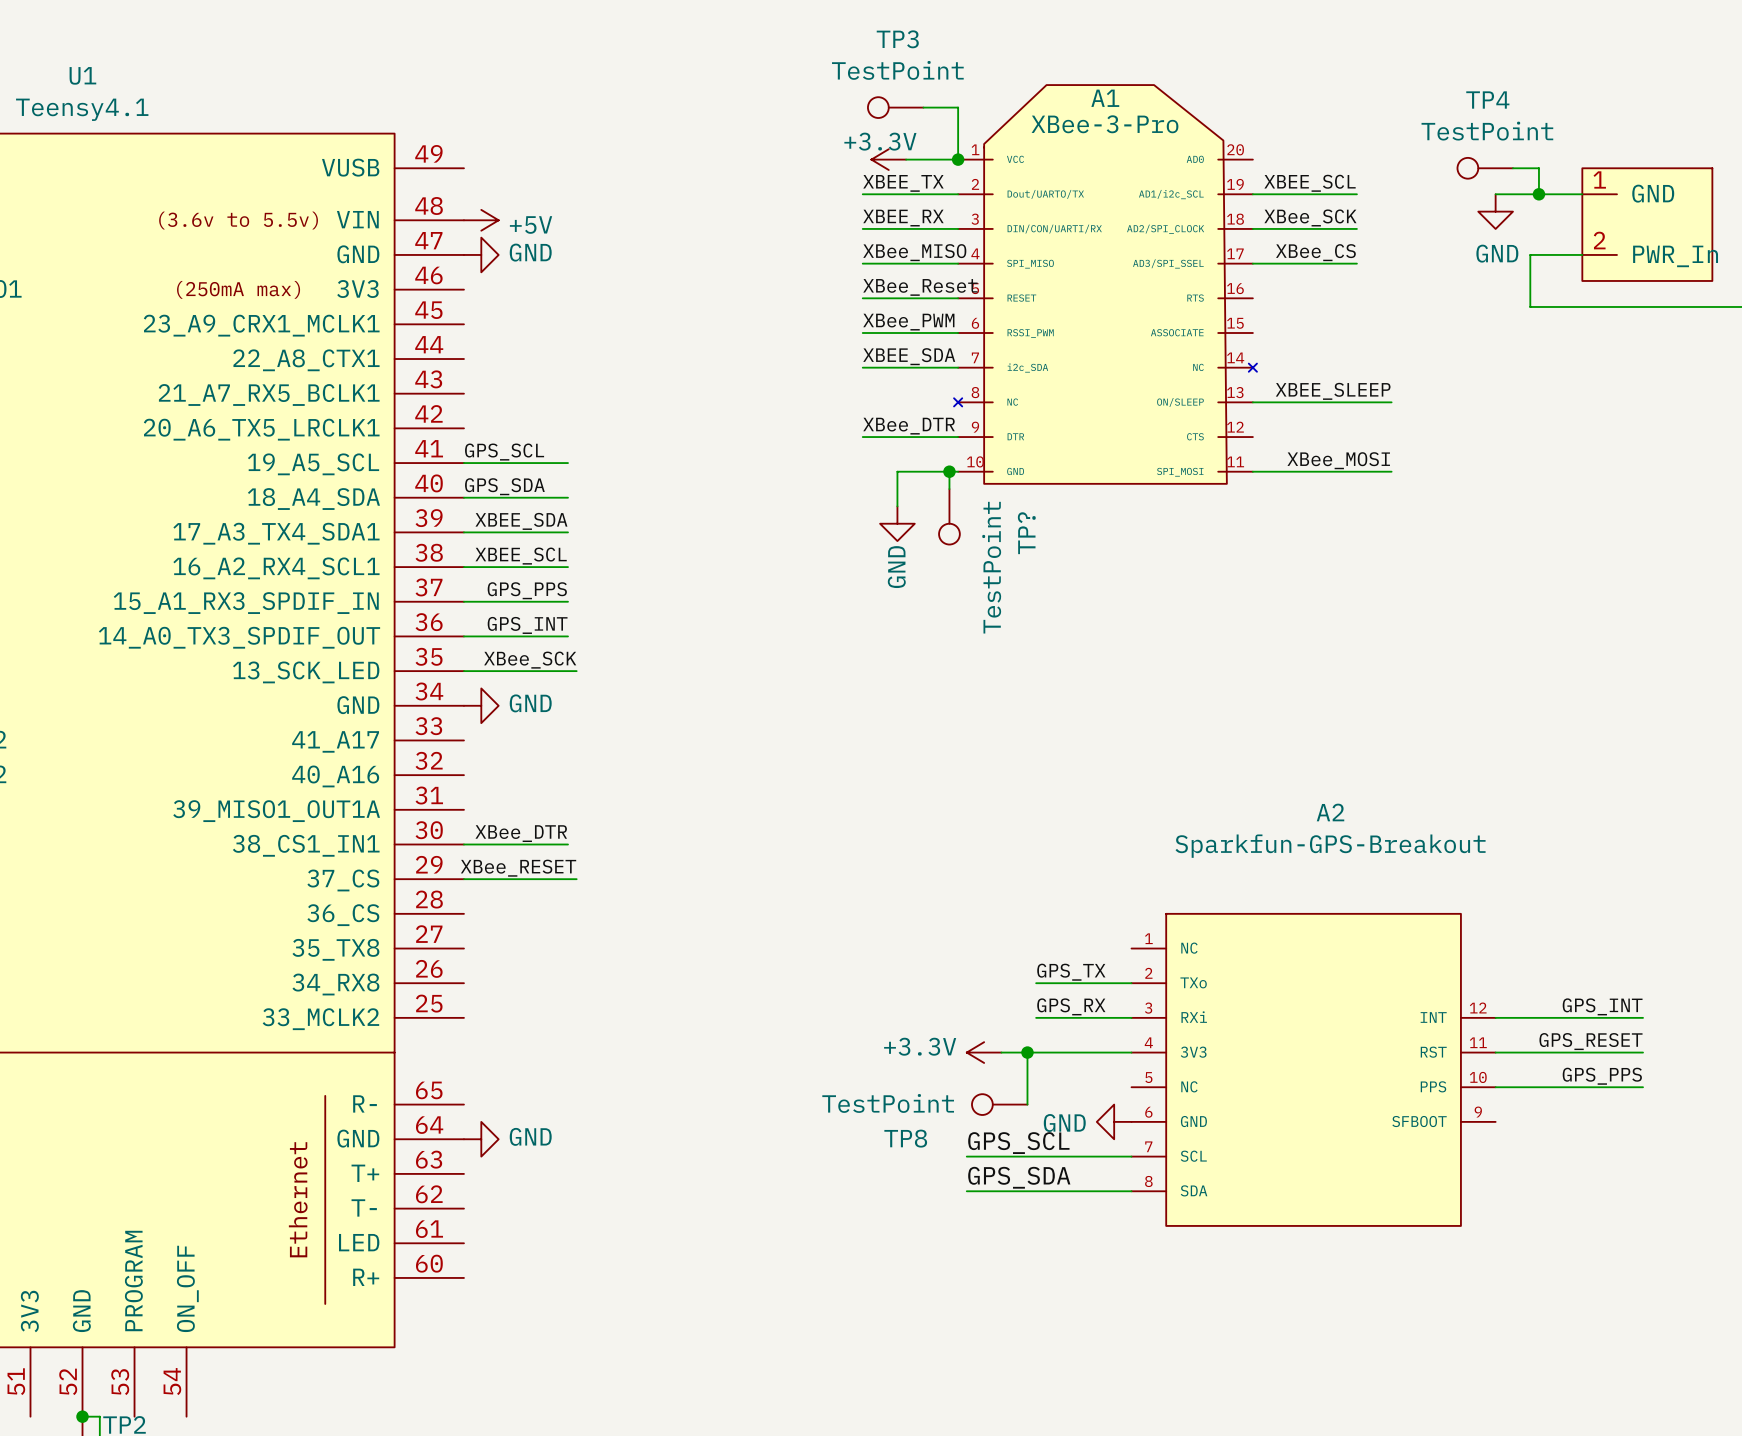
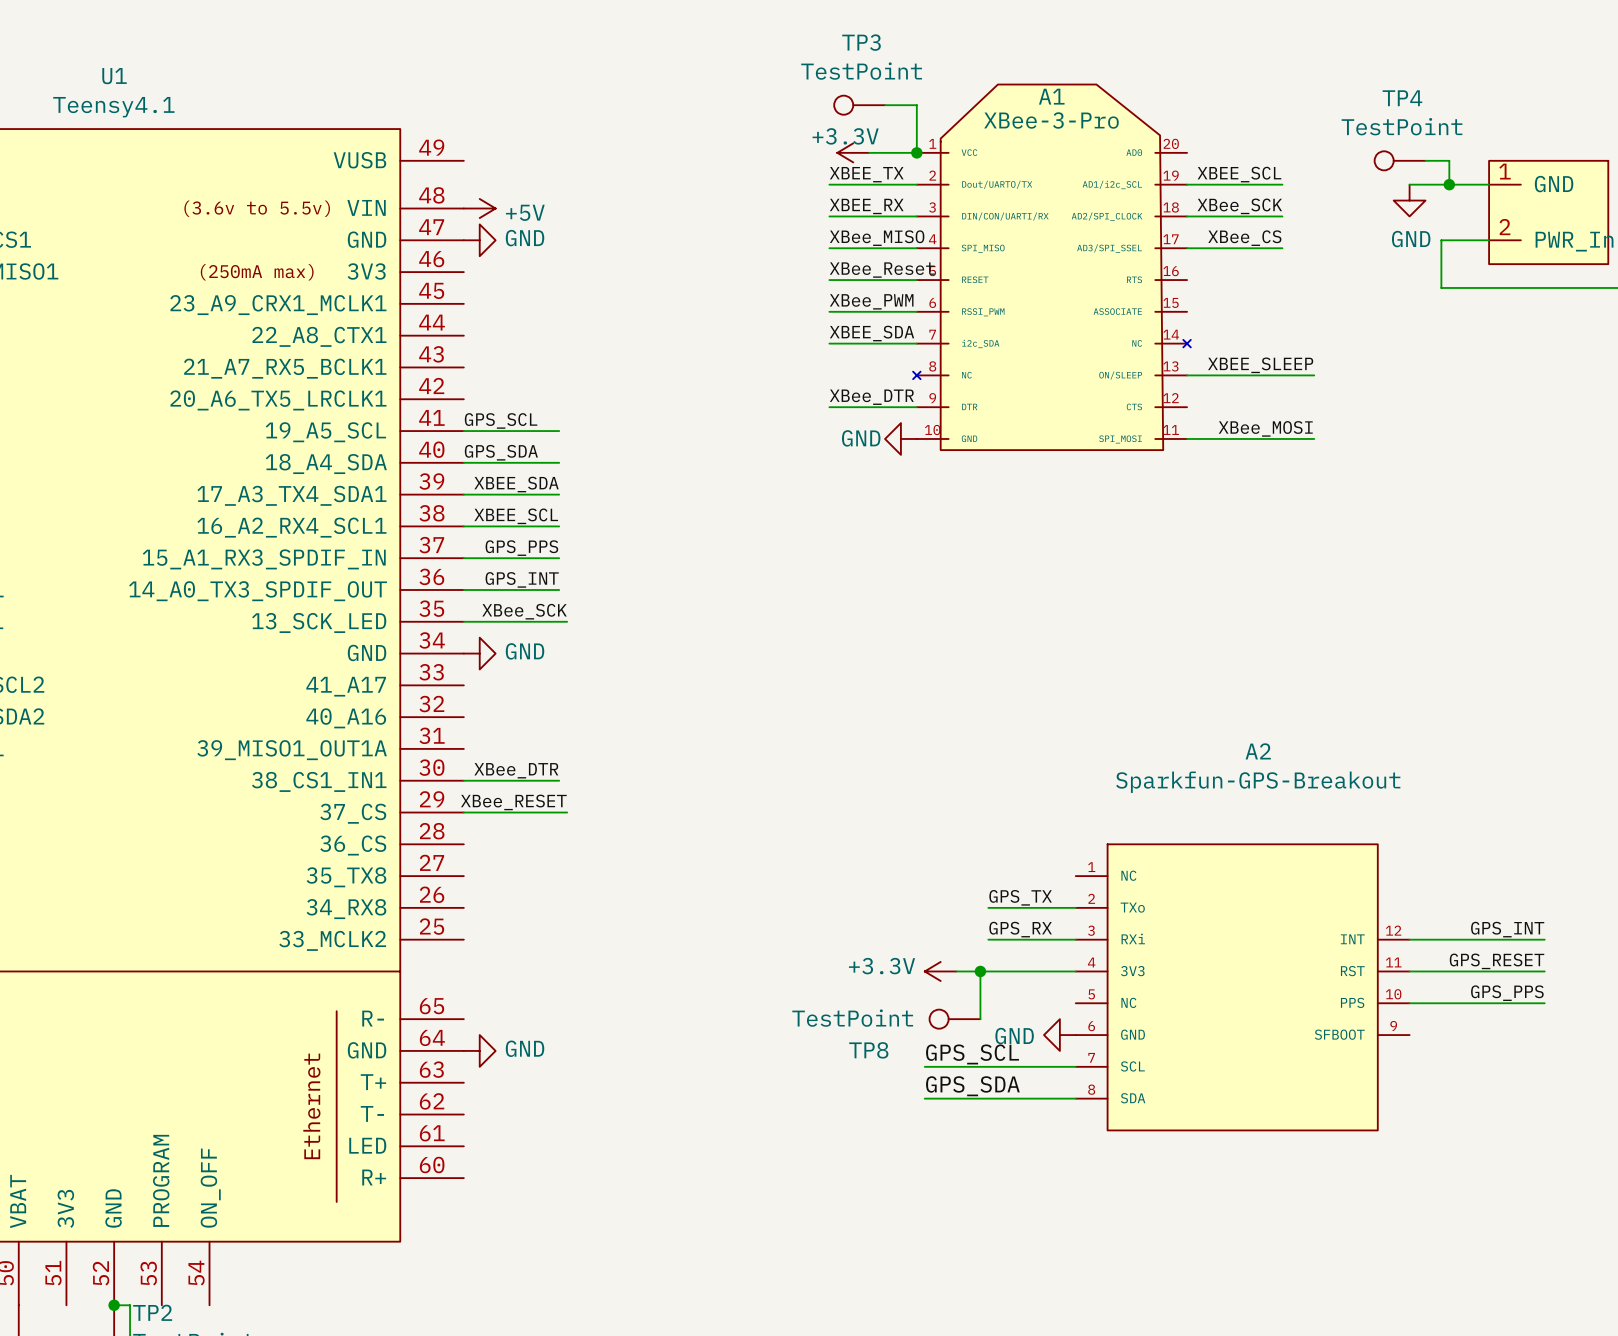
wire: (949, 471) (949, 489) -> none
junction: (949, 471) -> none
wire: (958, 471) (897, 471) (897, 506) -> none
TP?: TestPoint (949, 516) -> none
power symbol rotation: 0° (897, 523) -> 90° clockwise (900, 438)
power symbol position: GND (897, 523) -> GND (900, 438)

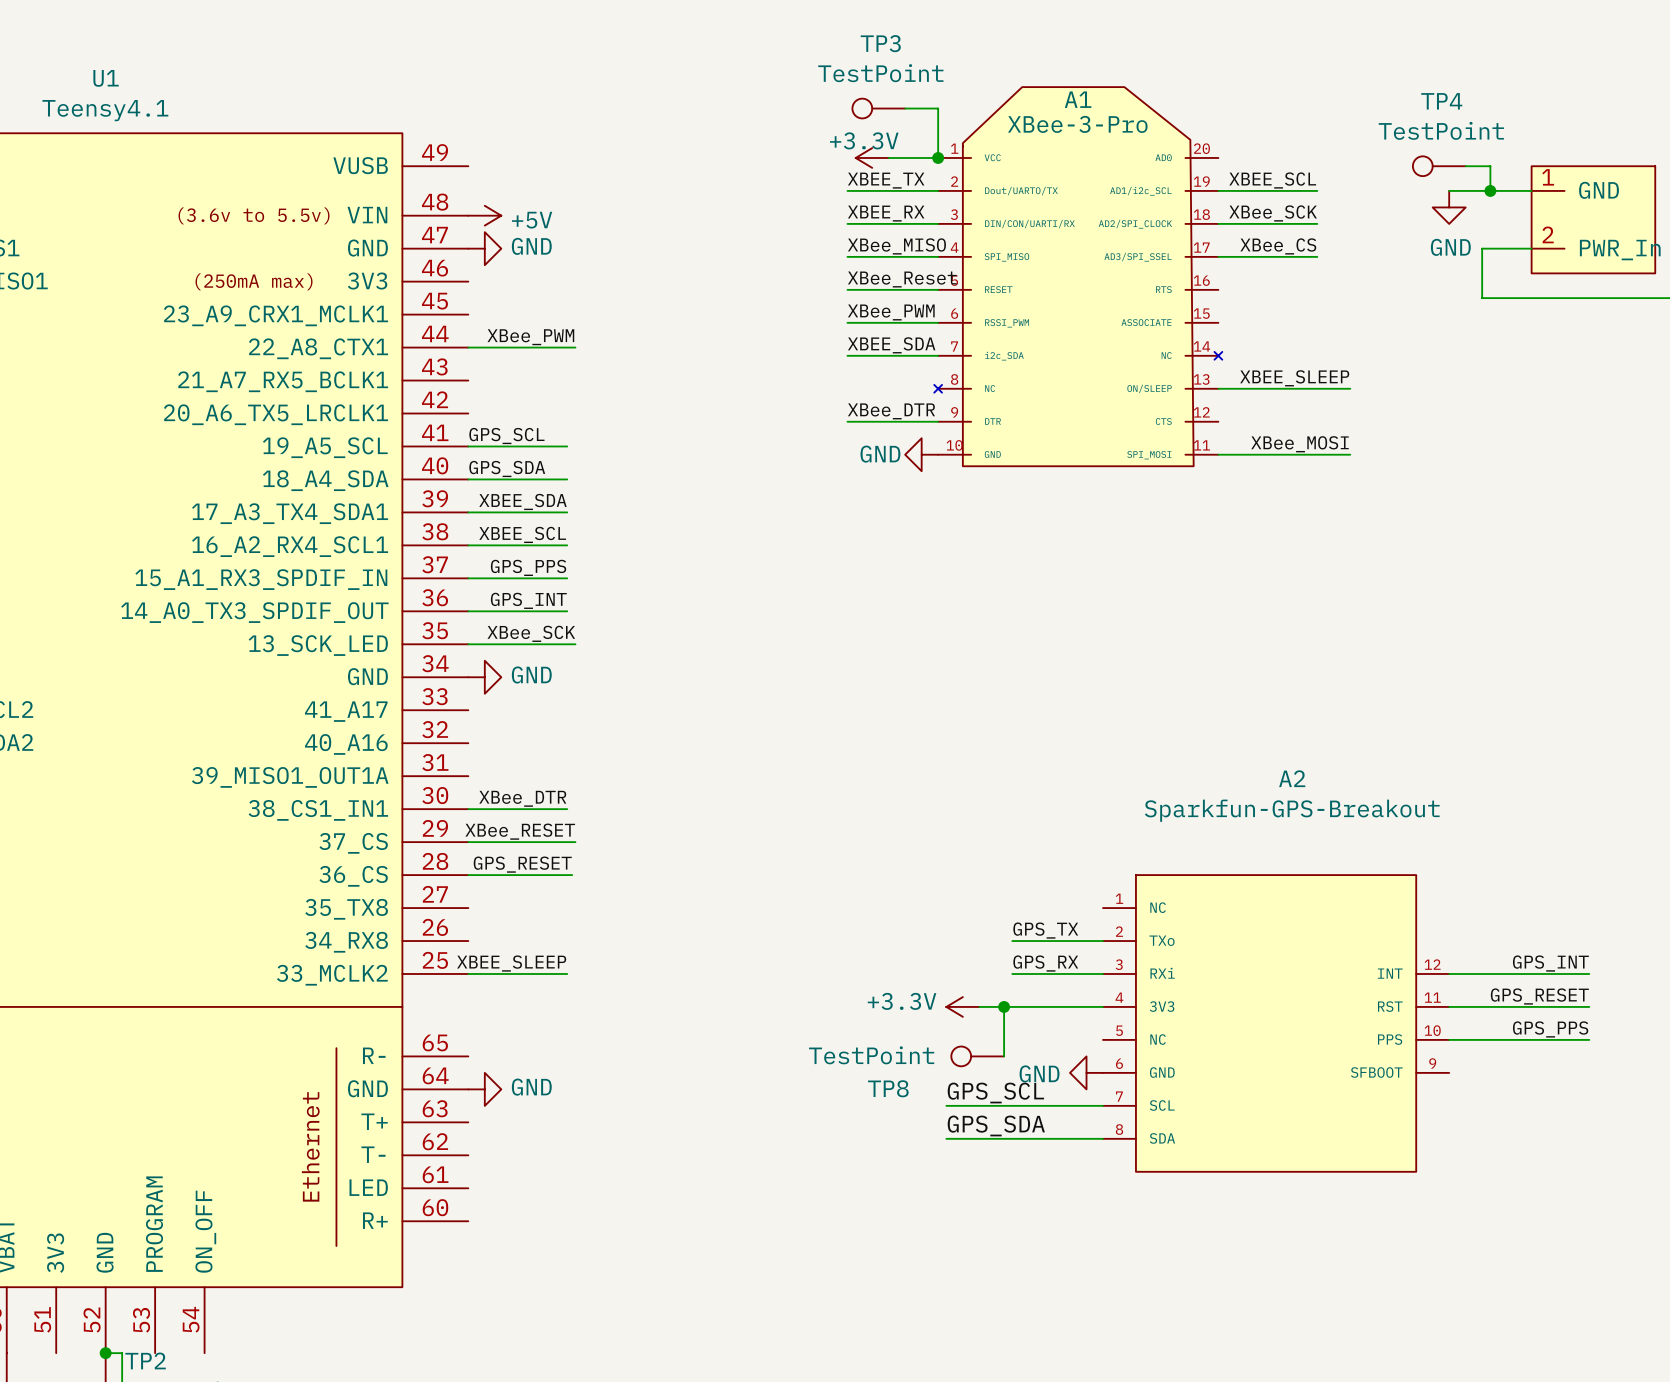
label: none -> XBee_PWM (530, 337)
wire: none -> (468, 347) (575, 347)
label: none -> GPS_RESET (522, 864)
wire: none -> (468, 875) (572, 875)
label: none -> XBEE_SLEEP (511, 963)
wire: none -> (468, 973) (567, 973)

